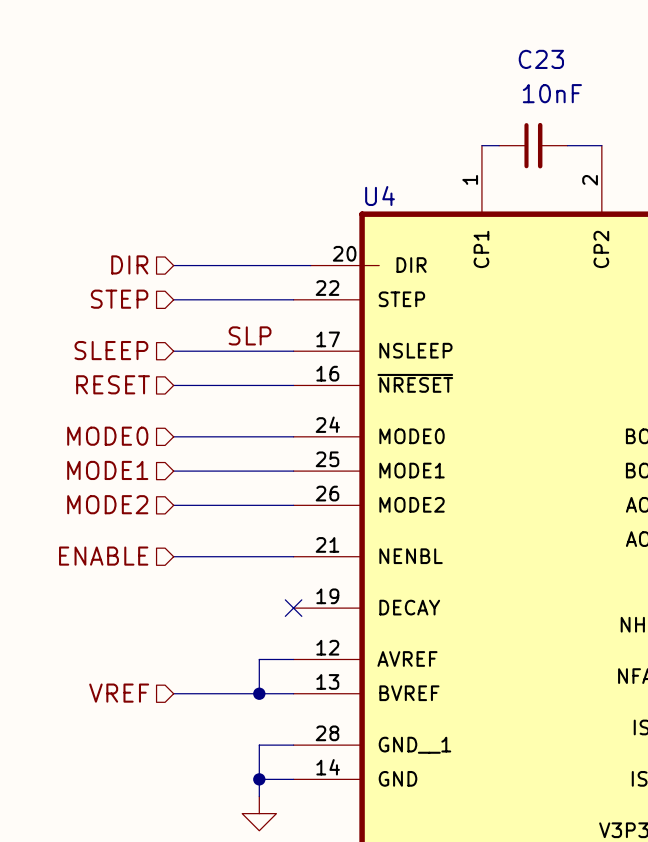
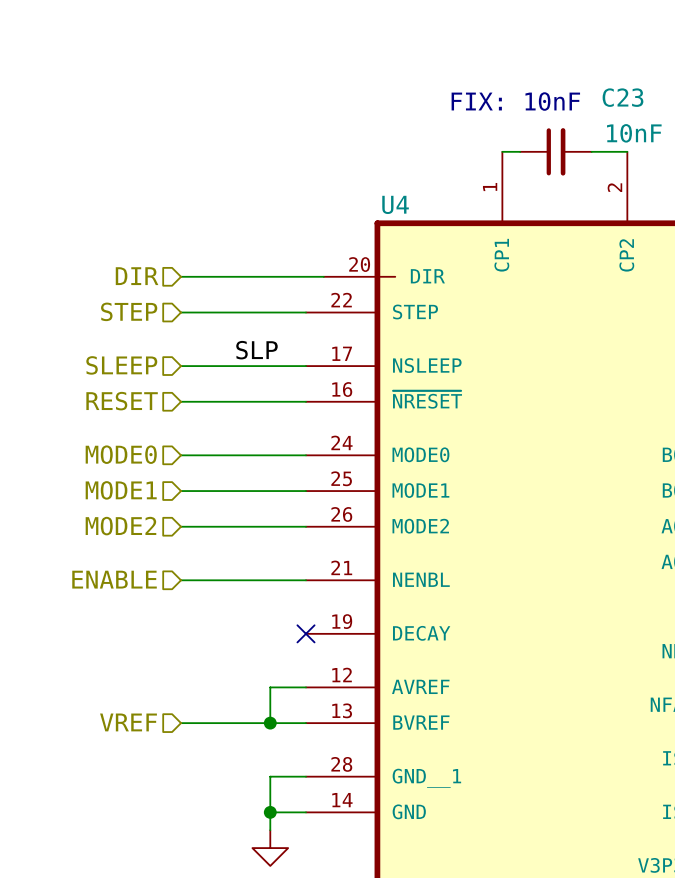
C23 name position: C23 (541, 59) -> C23 (622, 97)
C23 value position: 10nF (552, 93) -> 10nF (634, 133)
text: none -> FIX: 10nF (515, 101)

